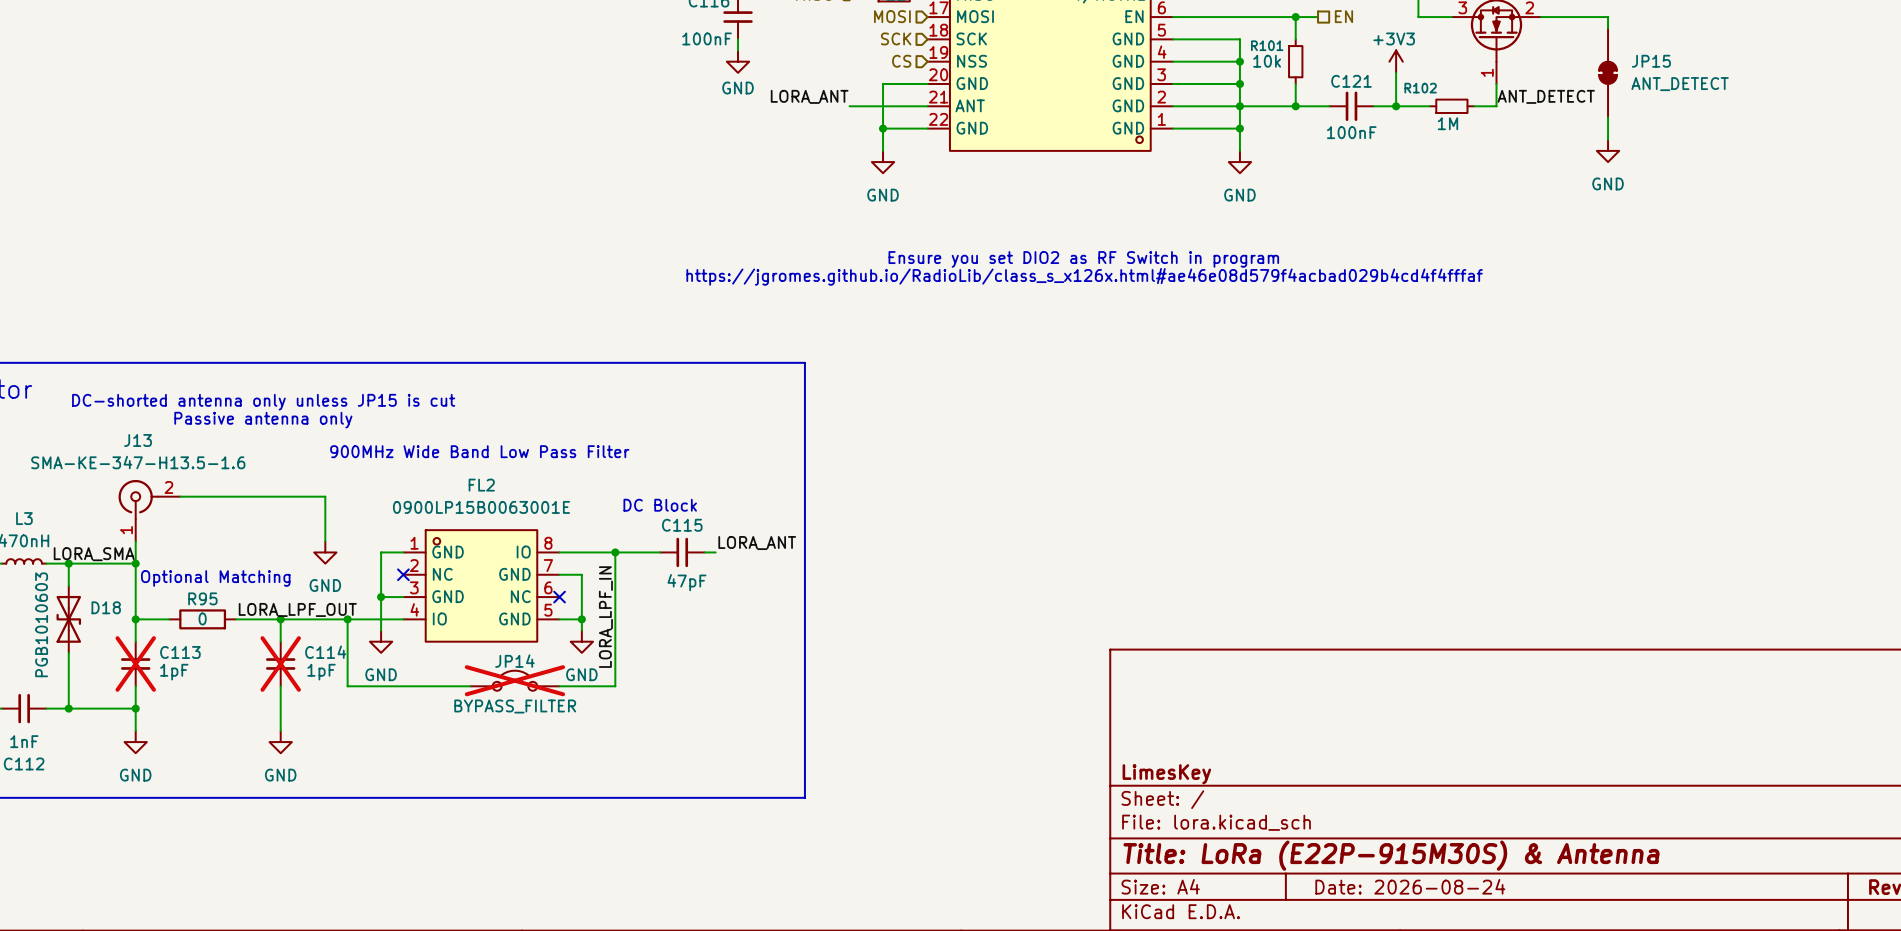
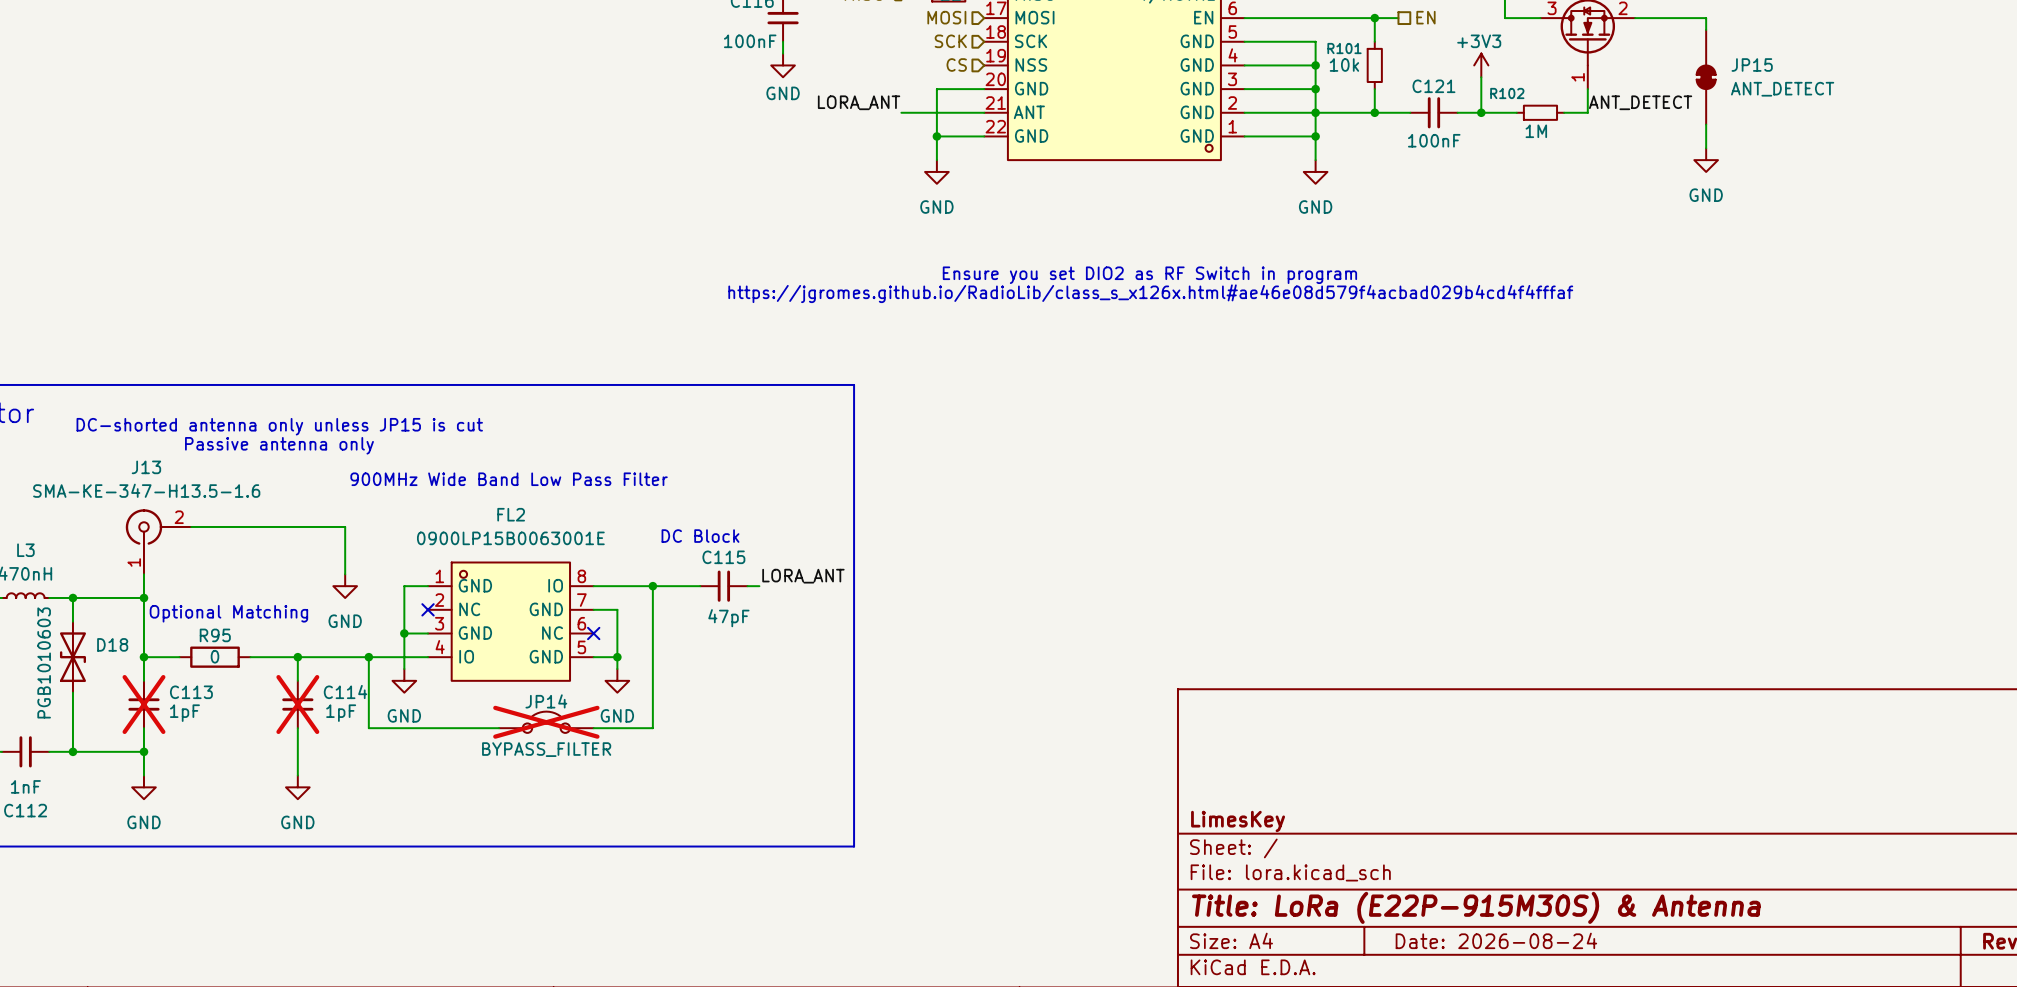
label: LORA_SMA (94, 554) -> none
label: LORA_LPF_OUT (297, 609) -> none
label: LORA_LPF_IN (605, 617) -> none

